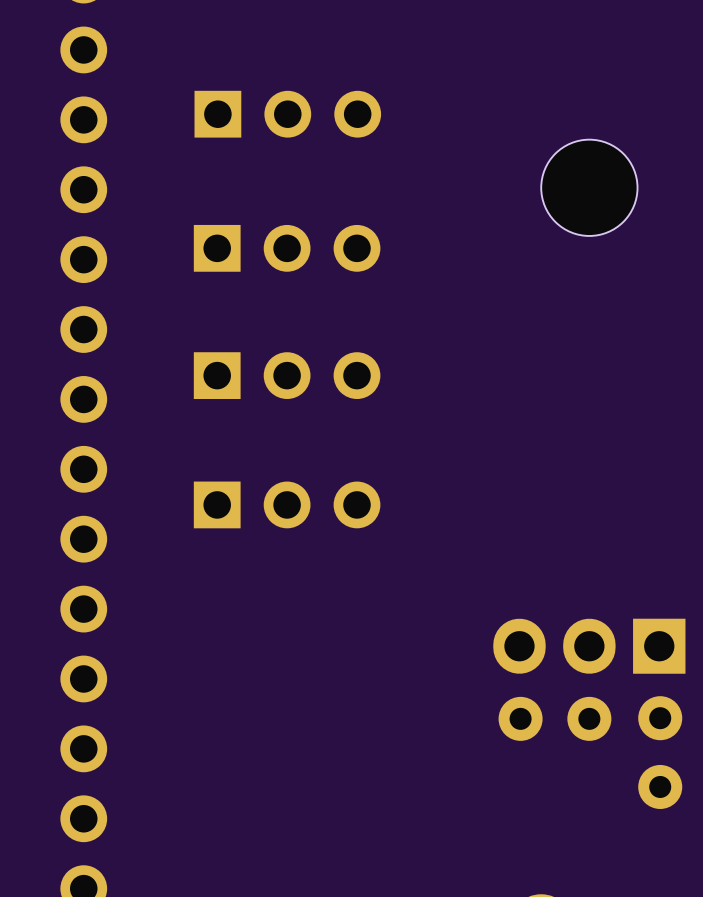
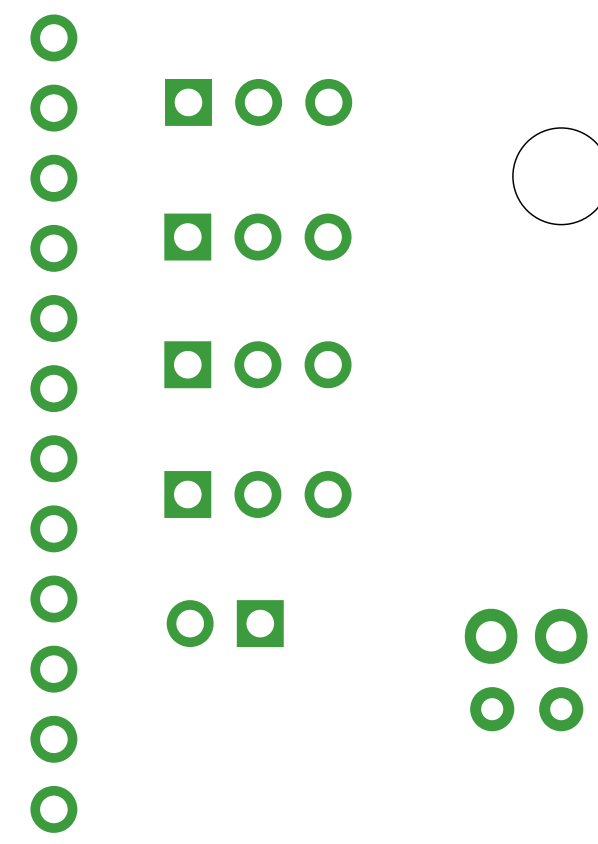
part: none -> (225, 623)

